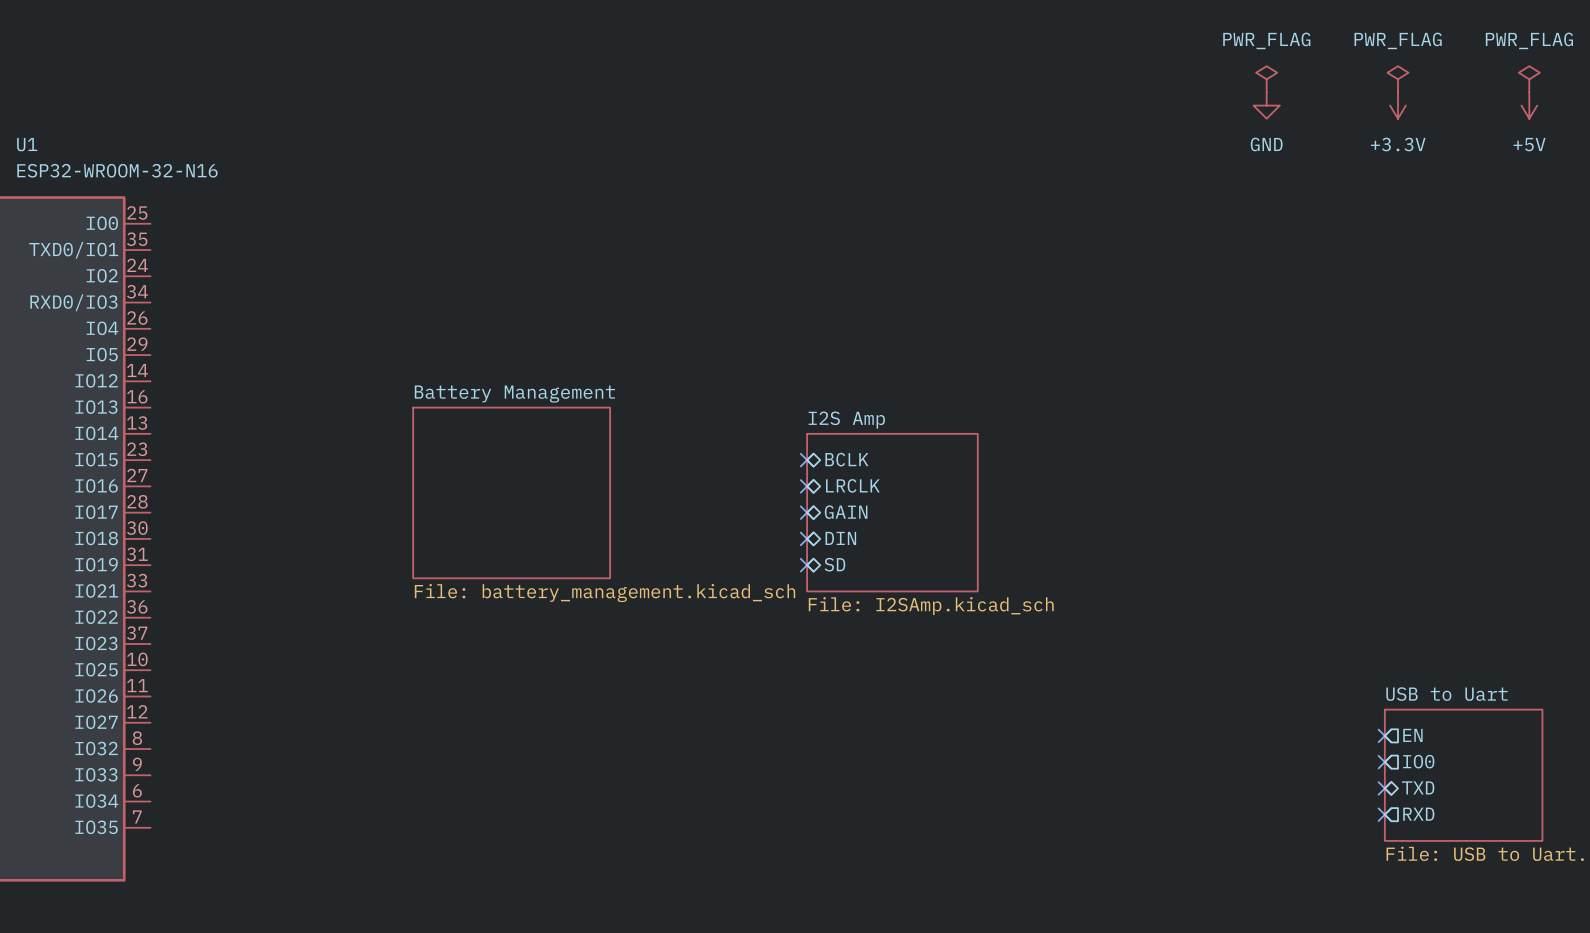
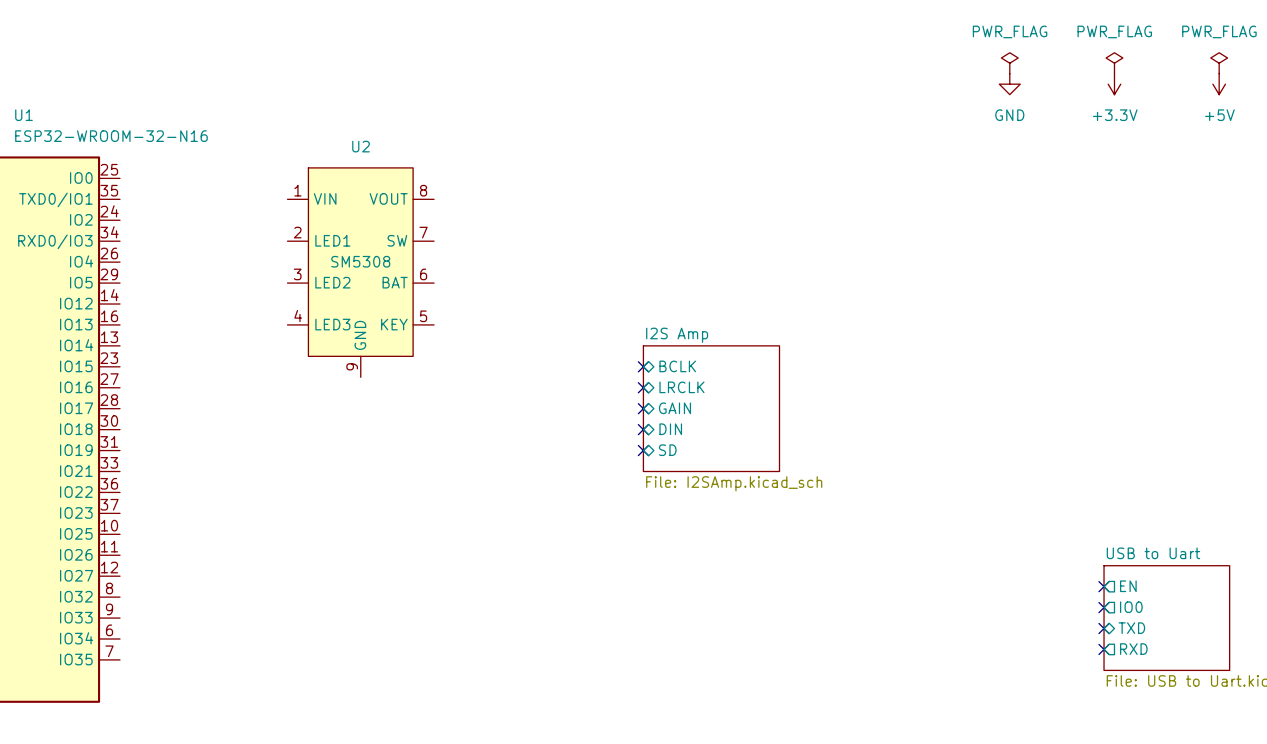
U2: none -> SM5308 (360, 272)
sheet Battery Management: File: battery_management.kicad_sch (511, 492) -> none

